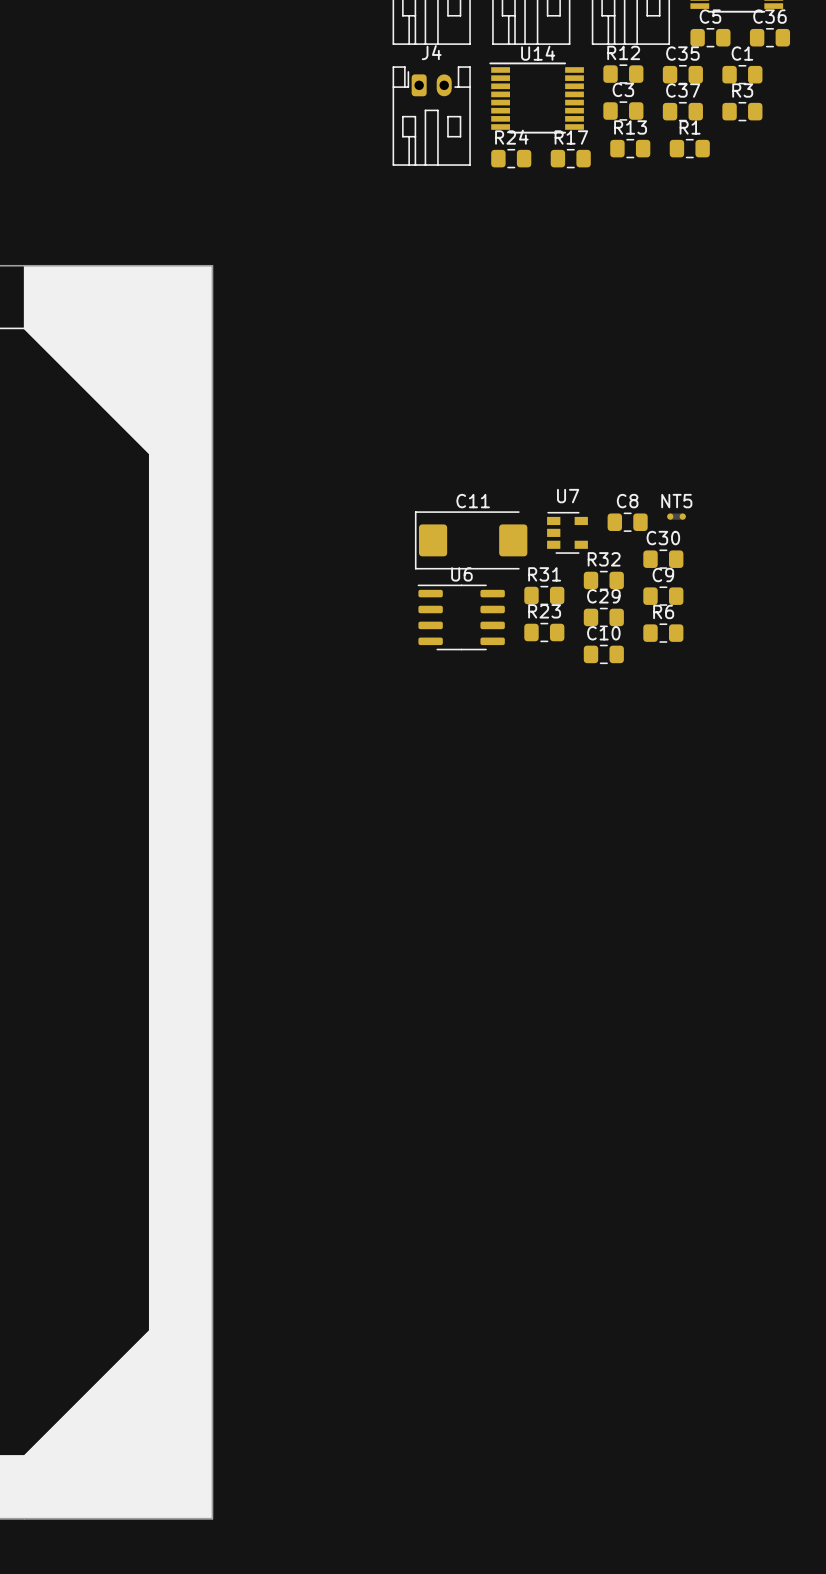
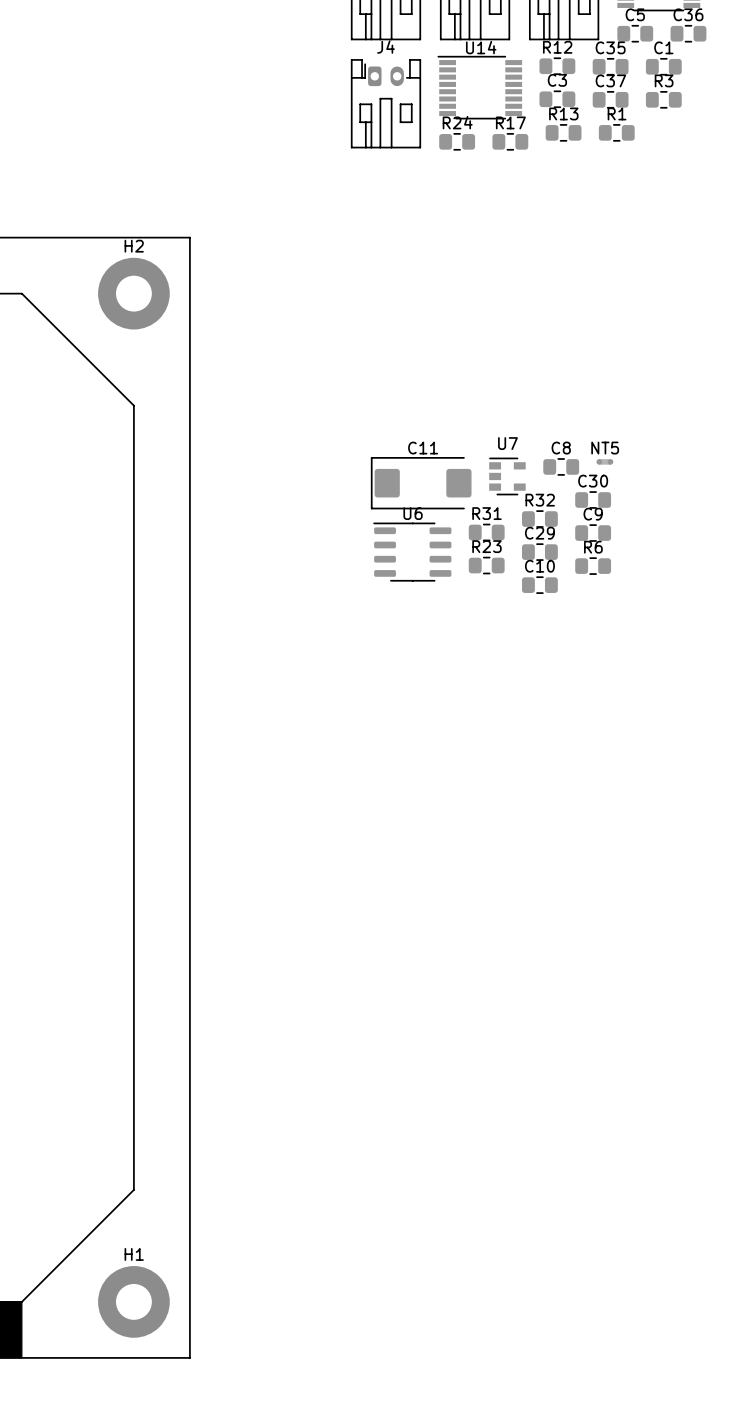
drawing: [23, 265, 214, 1520] -> none

